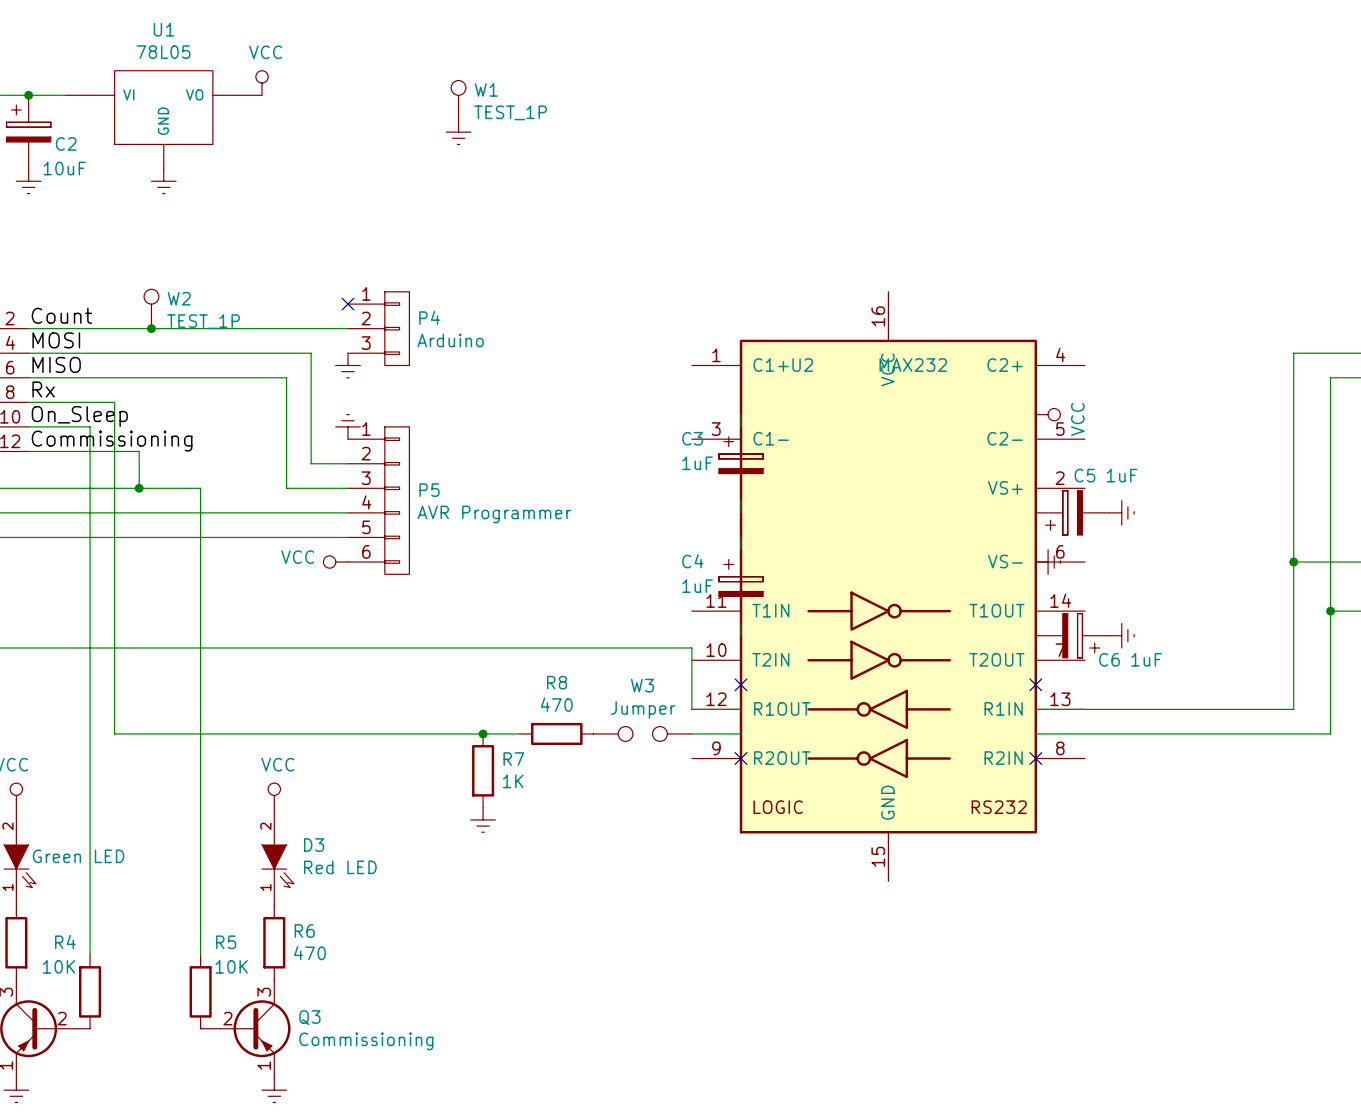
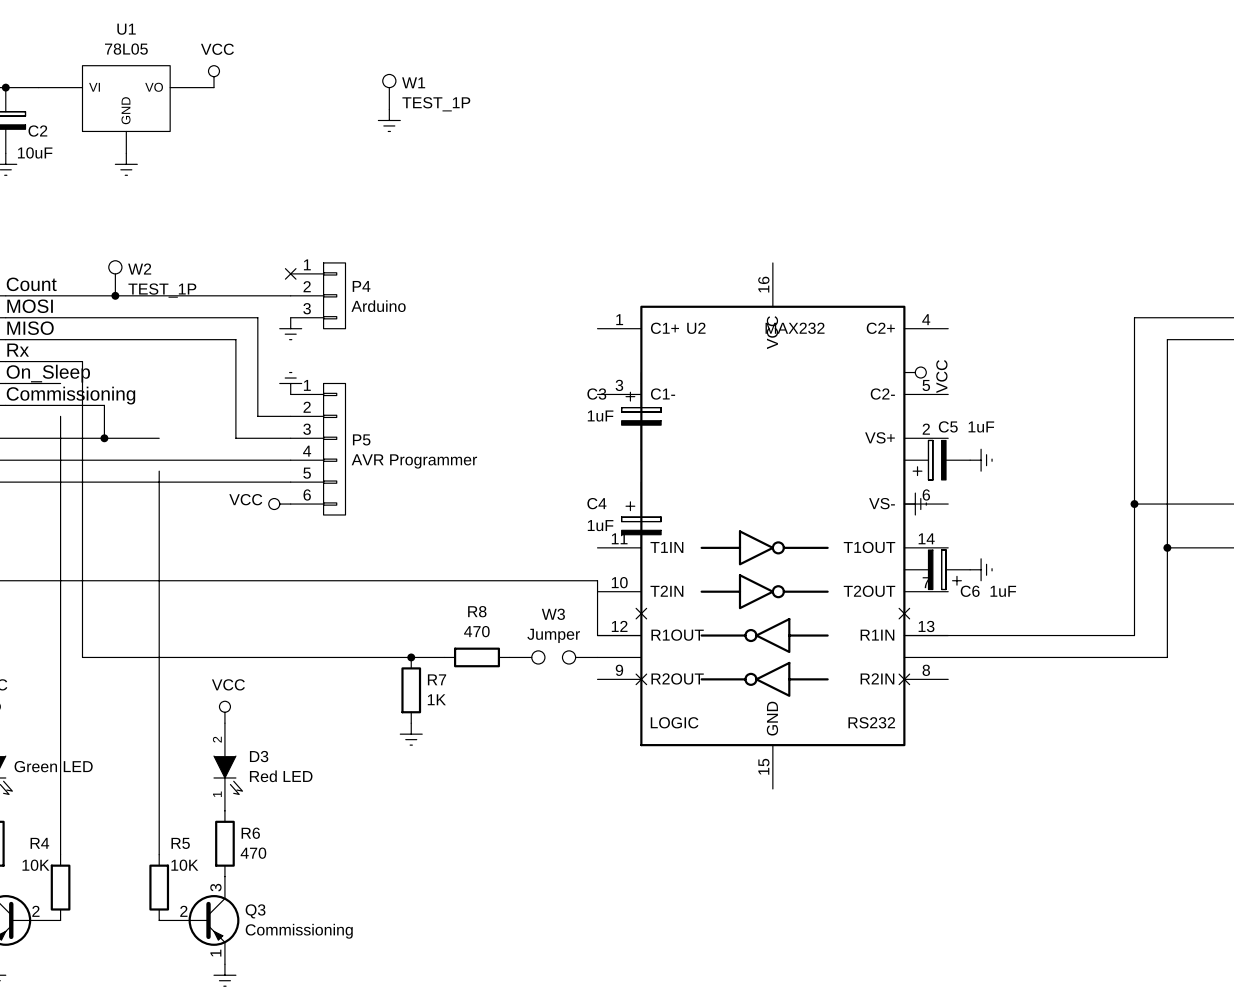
wire: (90, 426) (90, 463) -> none
wire: (200, 488) (200, 525) -> none

